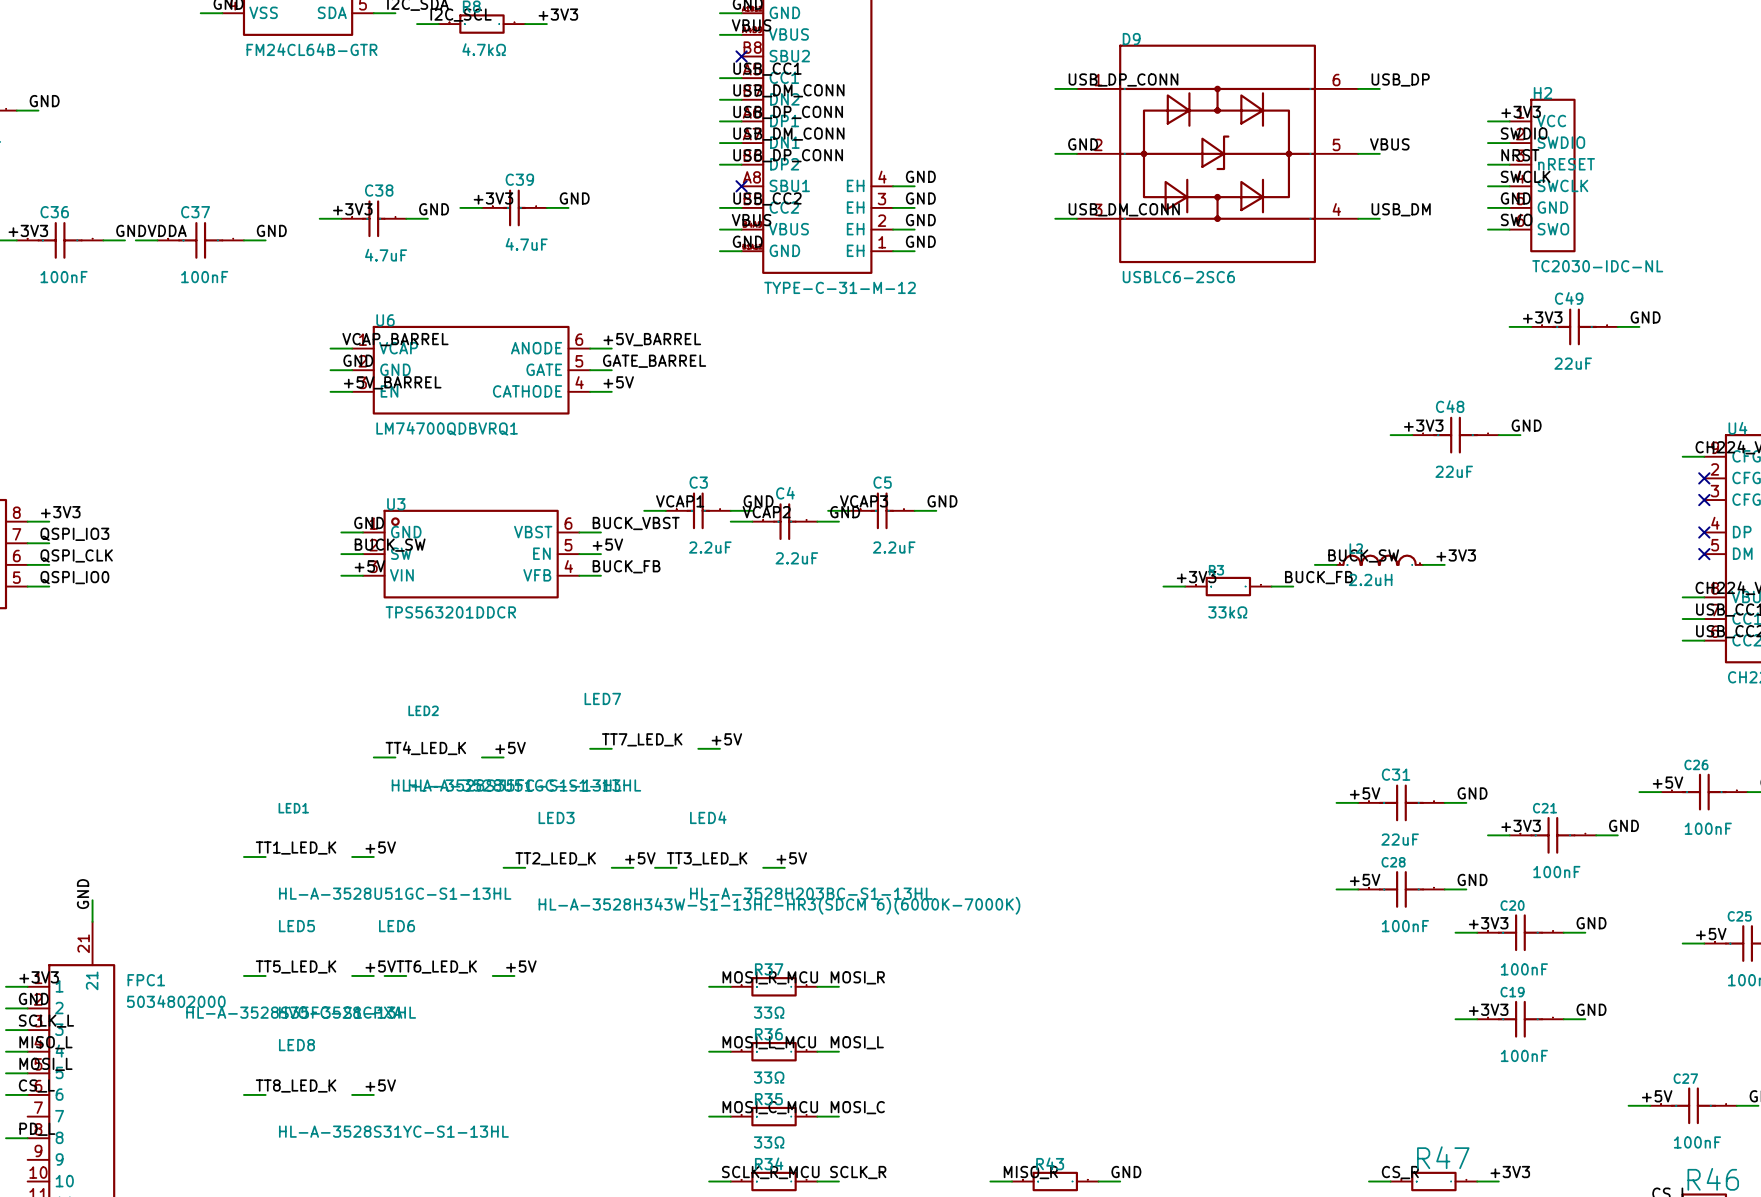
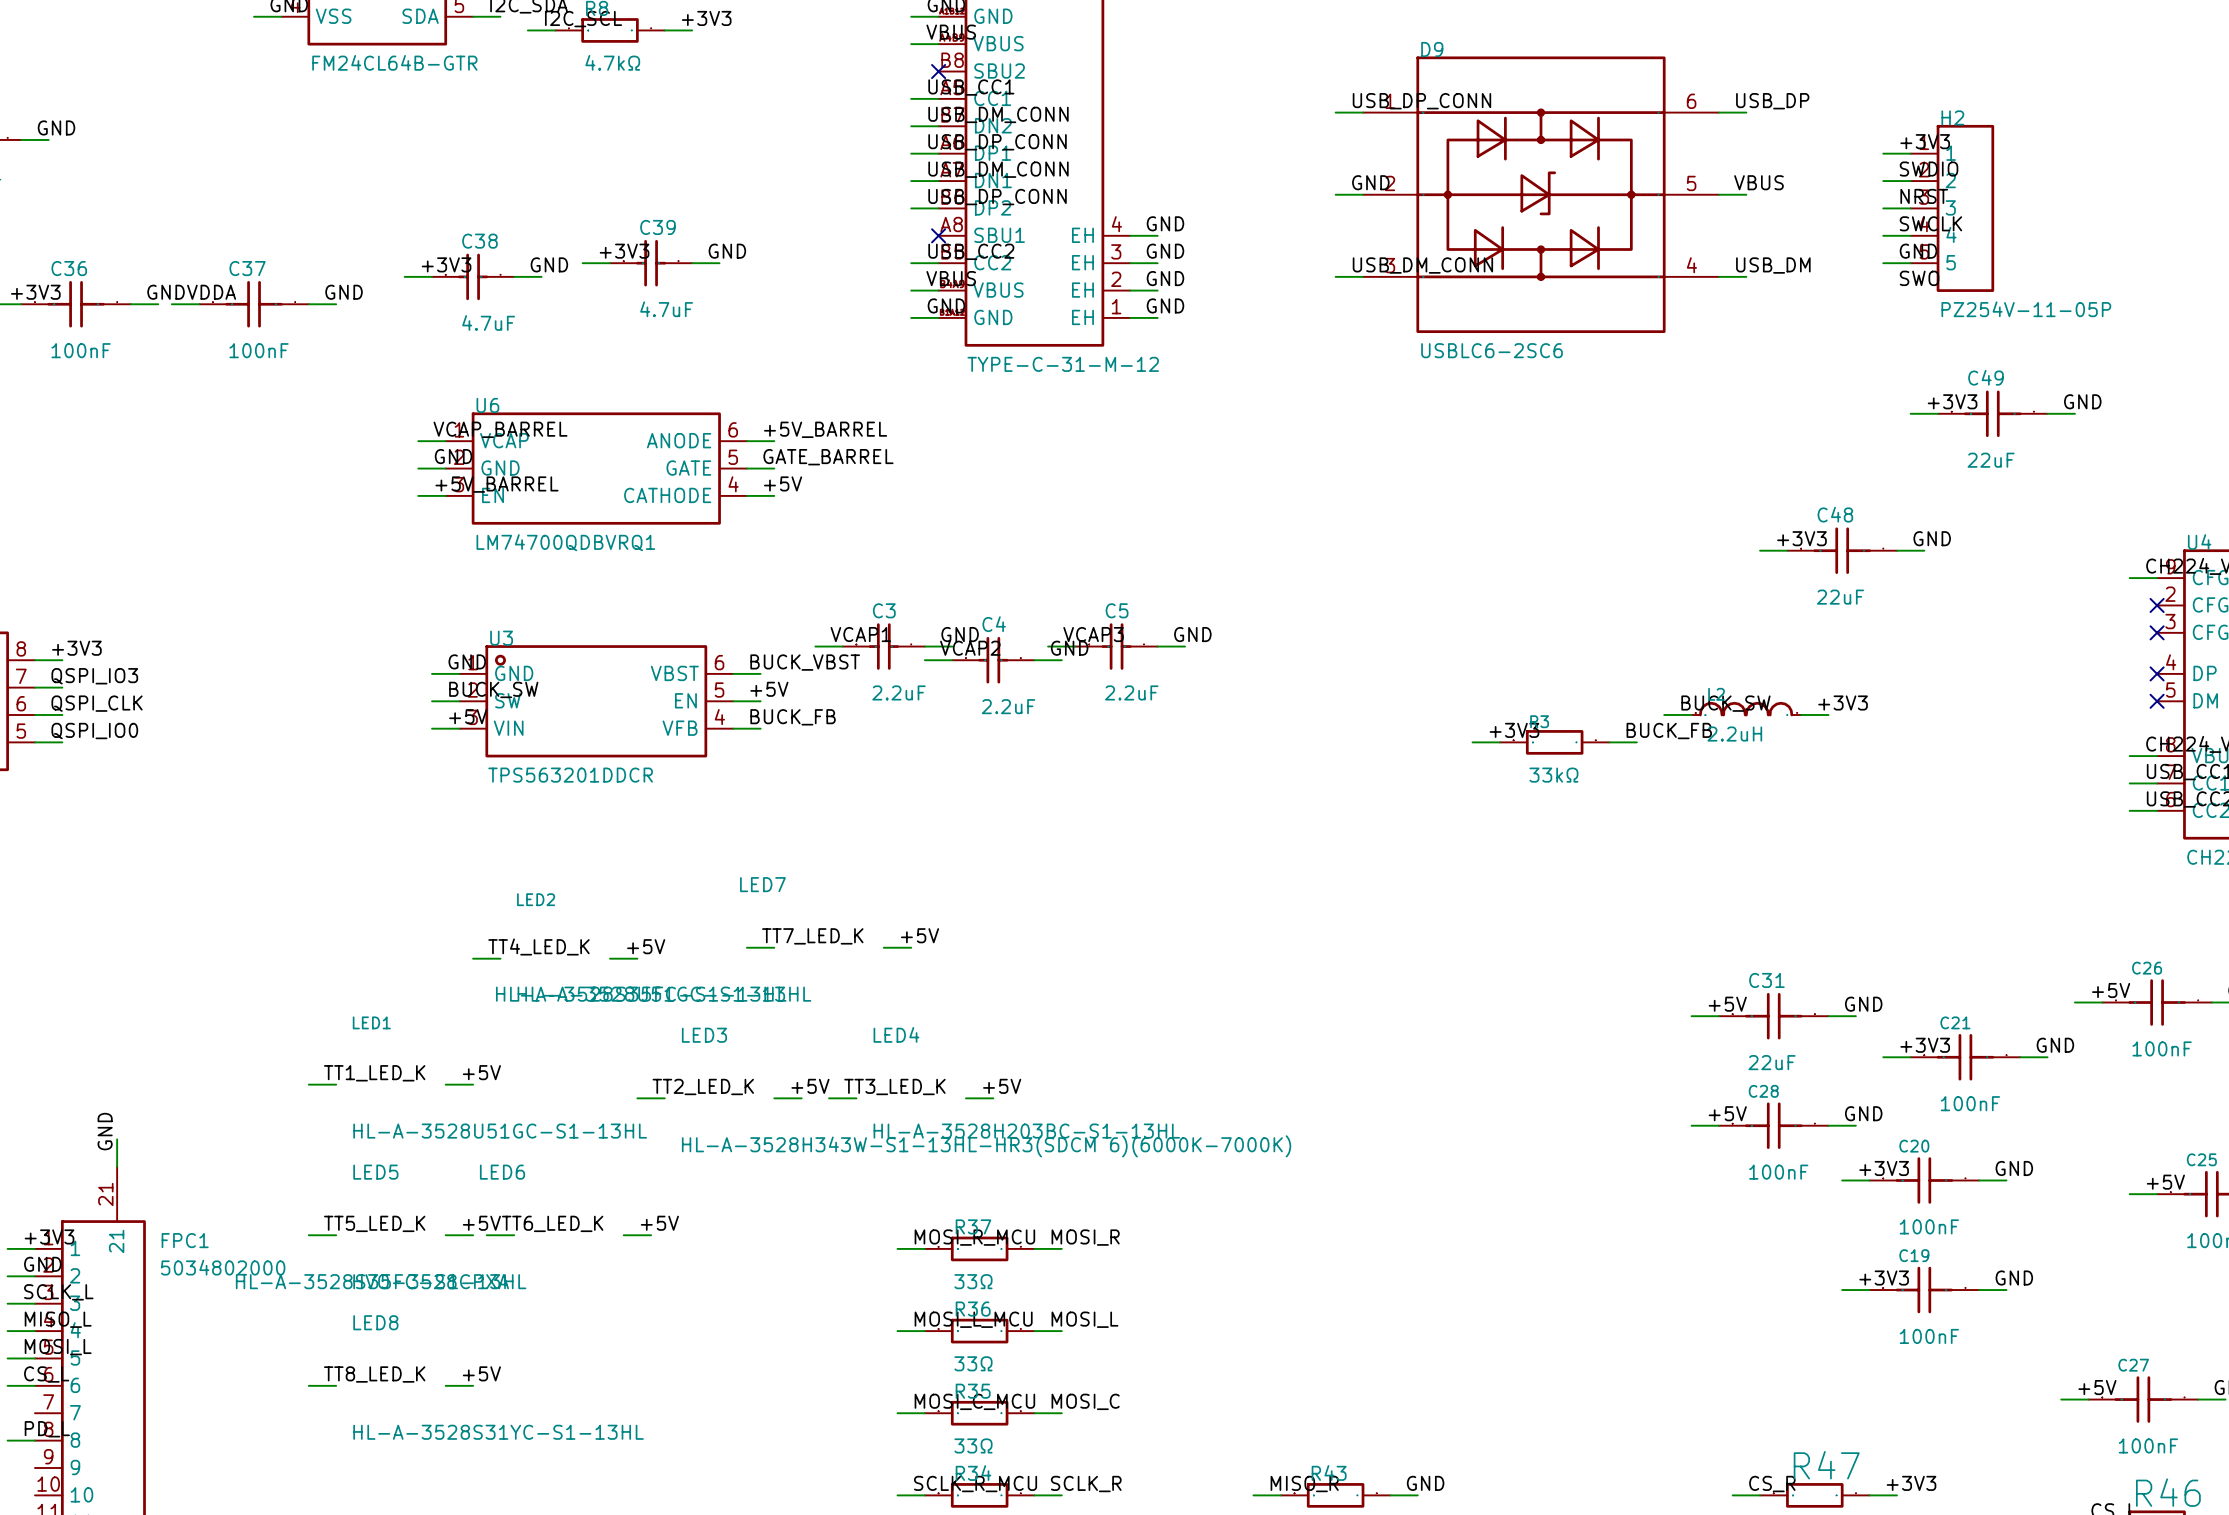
H2 symbol: [1509, 98, 1576, 253] -> [1910, 124, 1995, 292]
wire: (1487, 229) (1509, 229) -> none
H2 value: TC2030-IDC-NL (1597, 266) -> PZ254V-11-05P (2026, 309)

